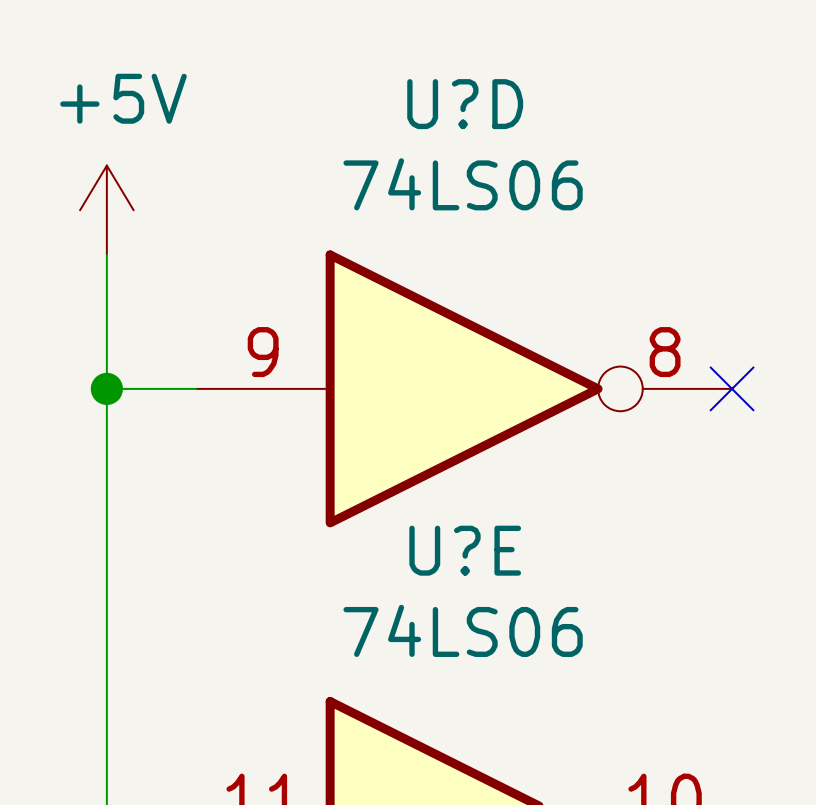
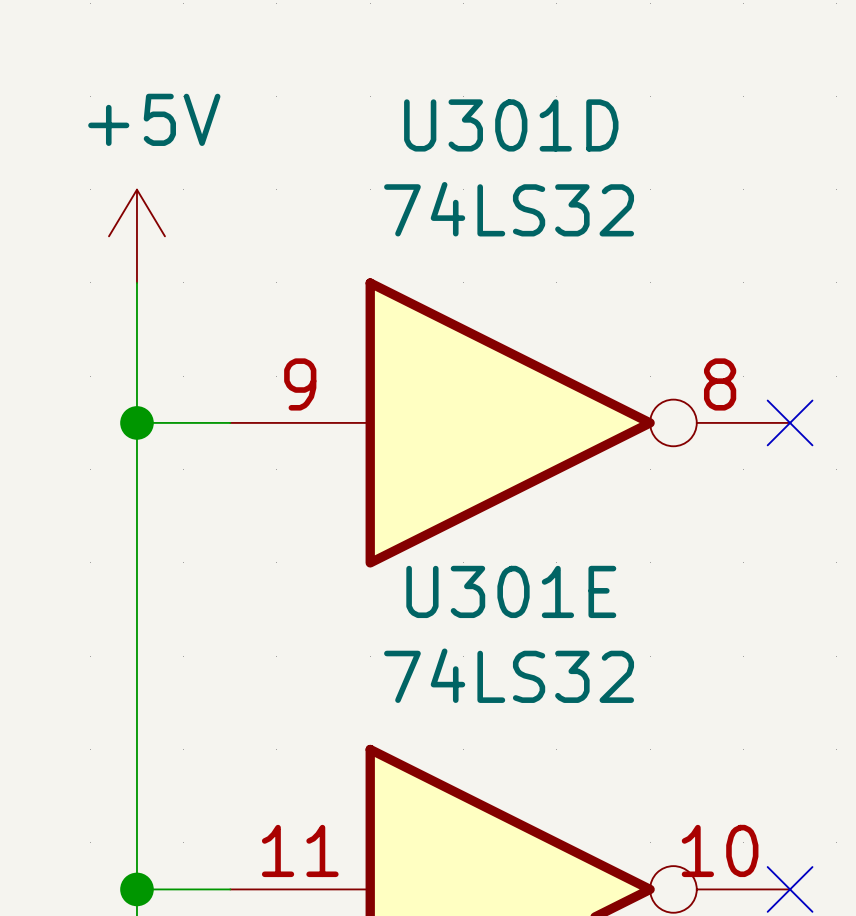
U?D name: U?D (465, 104) -> U301D (511, 125)
U?D value: 74LS06 (463, 184) -> 74LS32 (509, 209)
U?E name: U?E (465, 550) -> U301E (511, 591)
U?E value: 74LS06 (463, 630) -> 74LS32 (509, 675)

